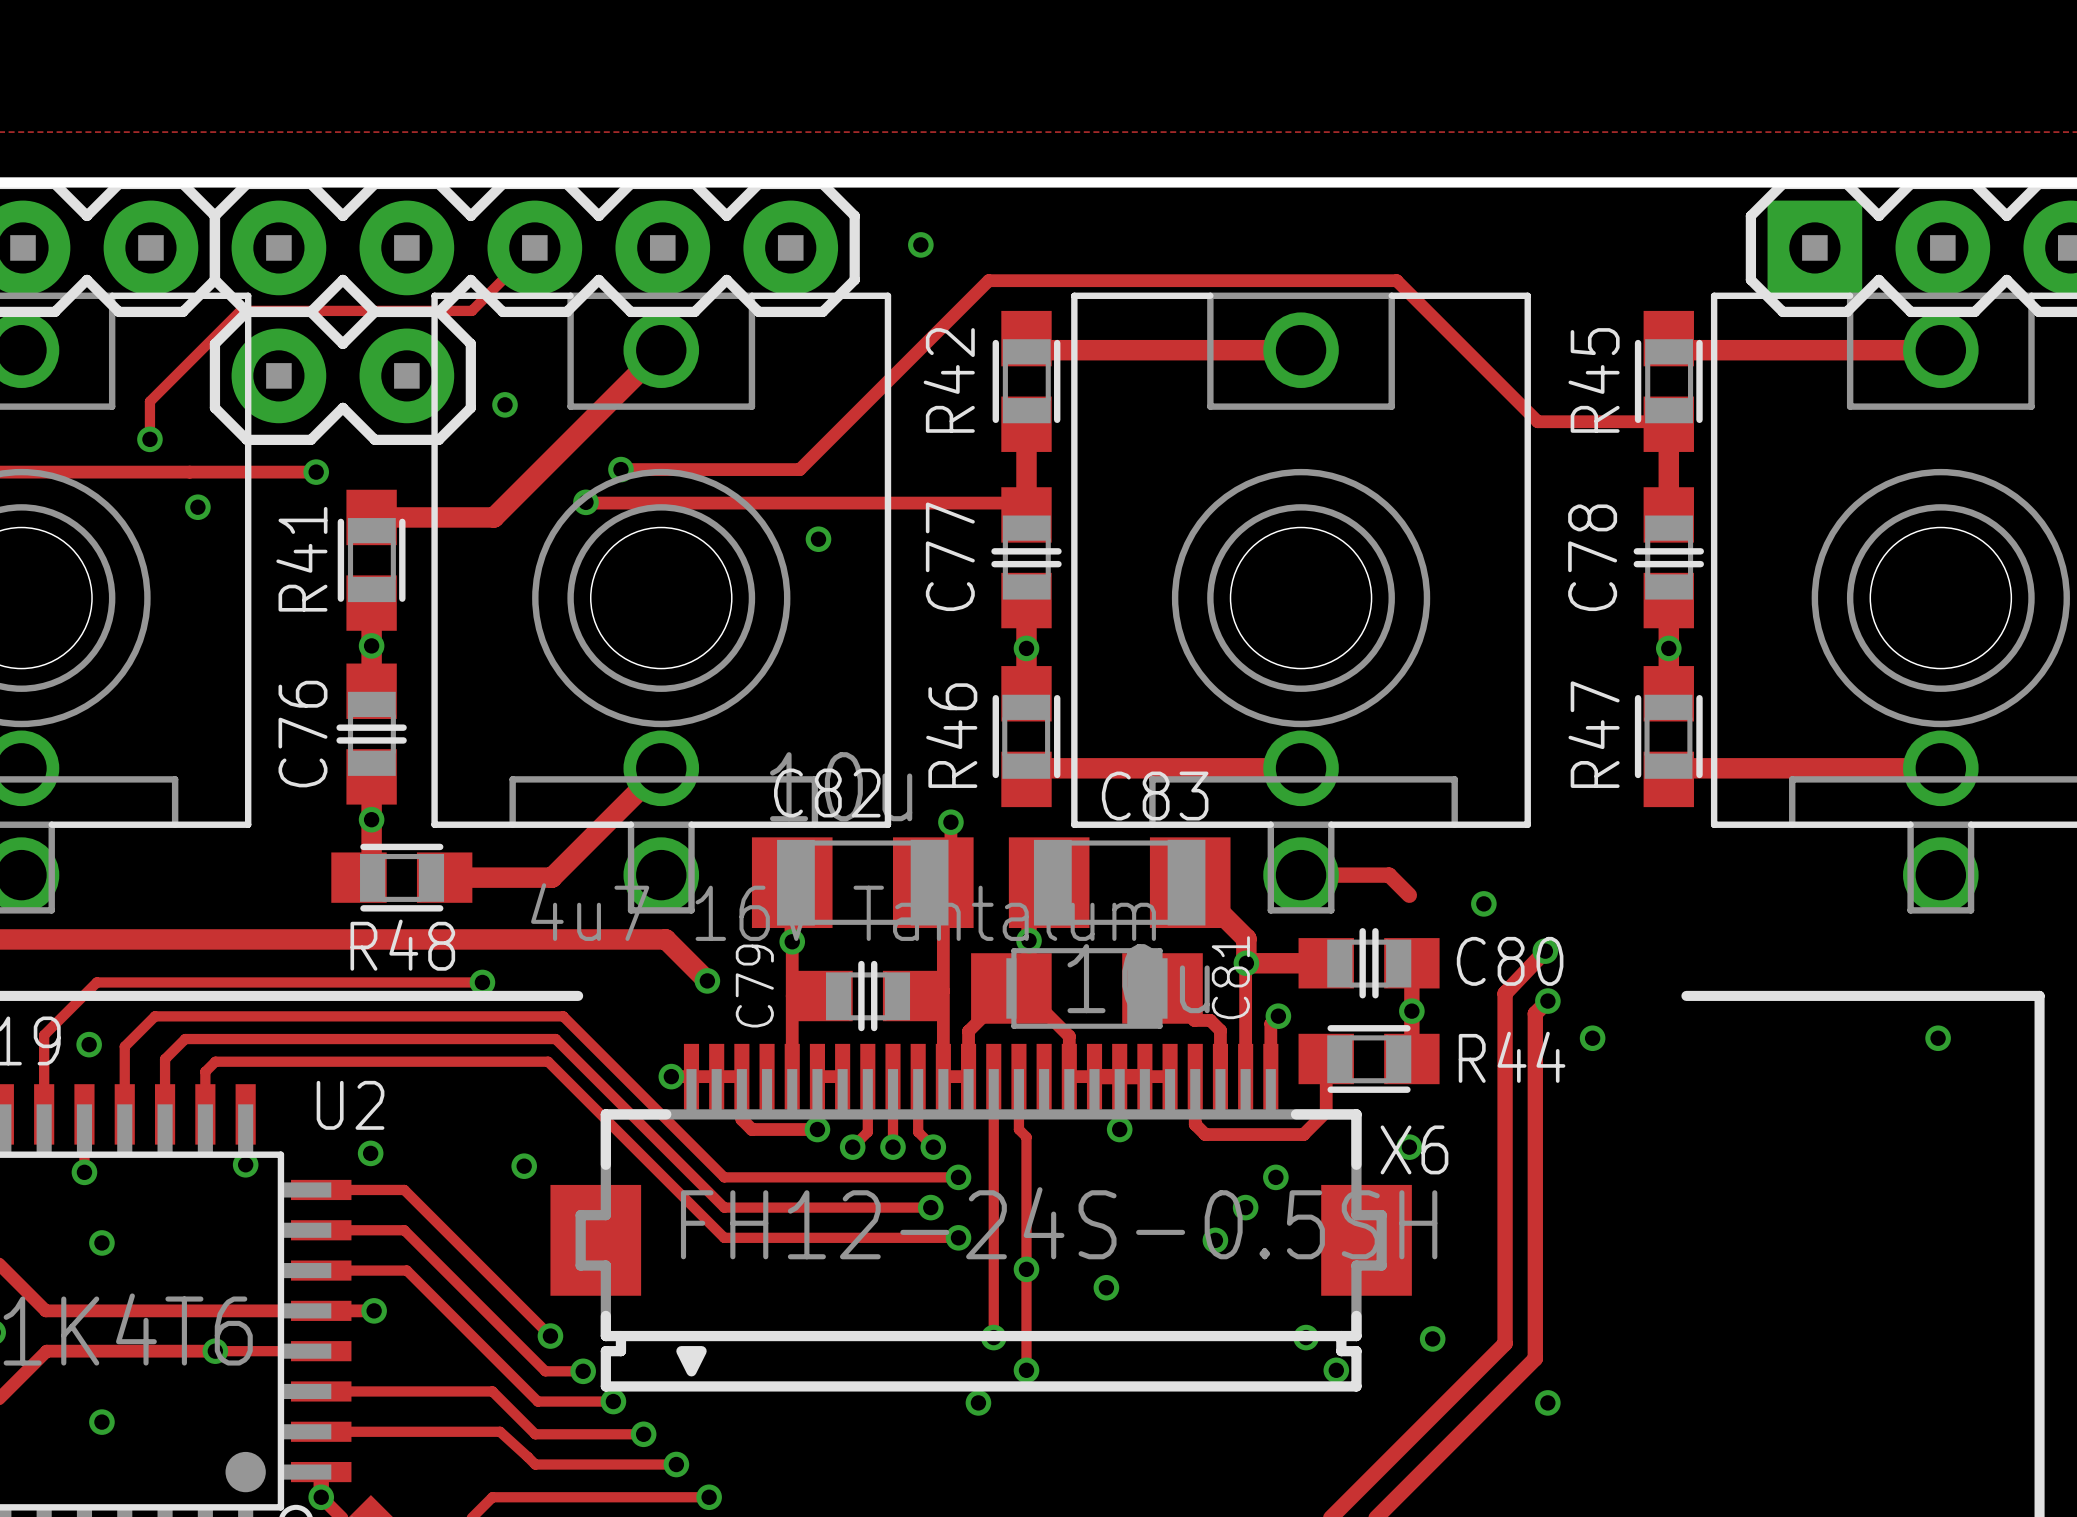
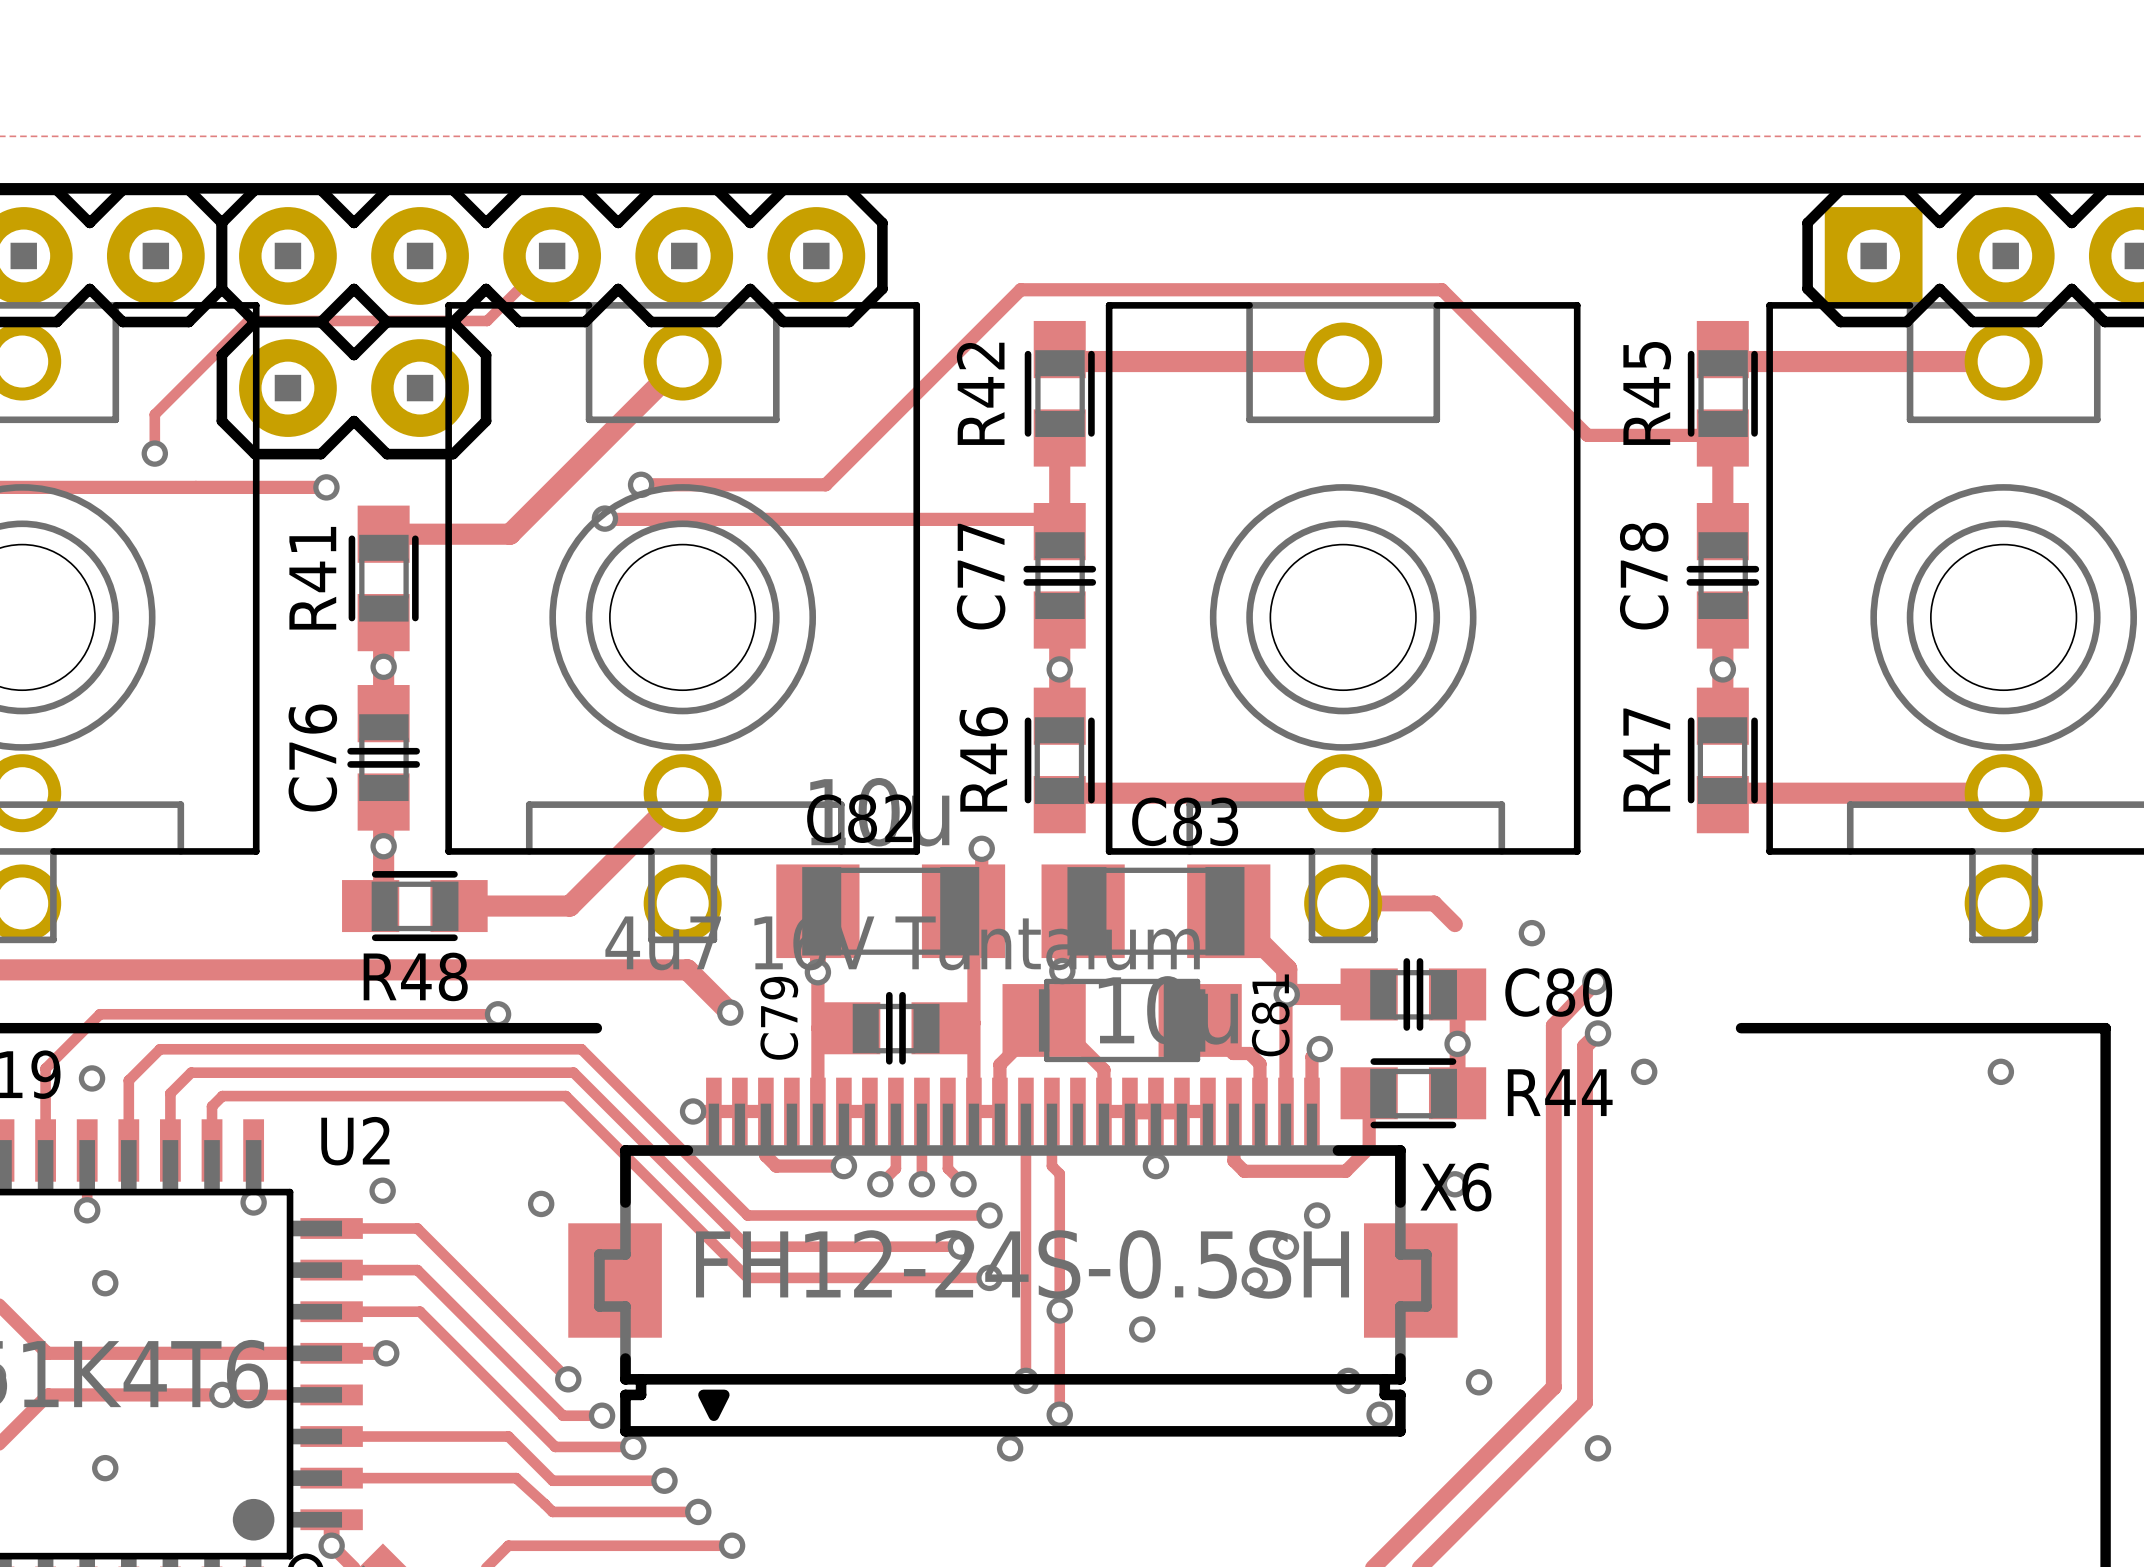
via: (920, 244) -> none
via: (505, 404) -> none
via: (197, 507) -> none
via: (818, 539) -> none

